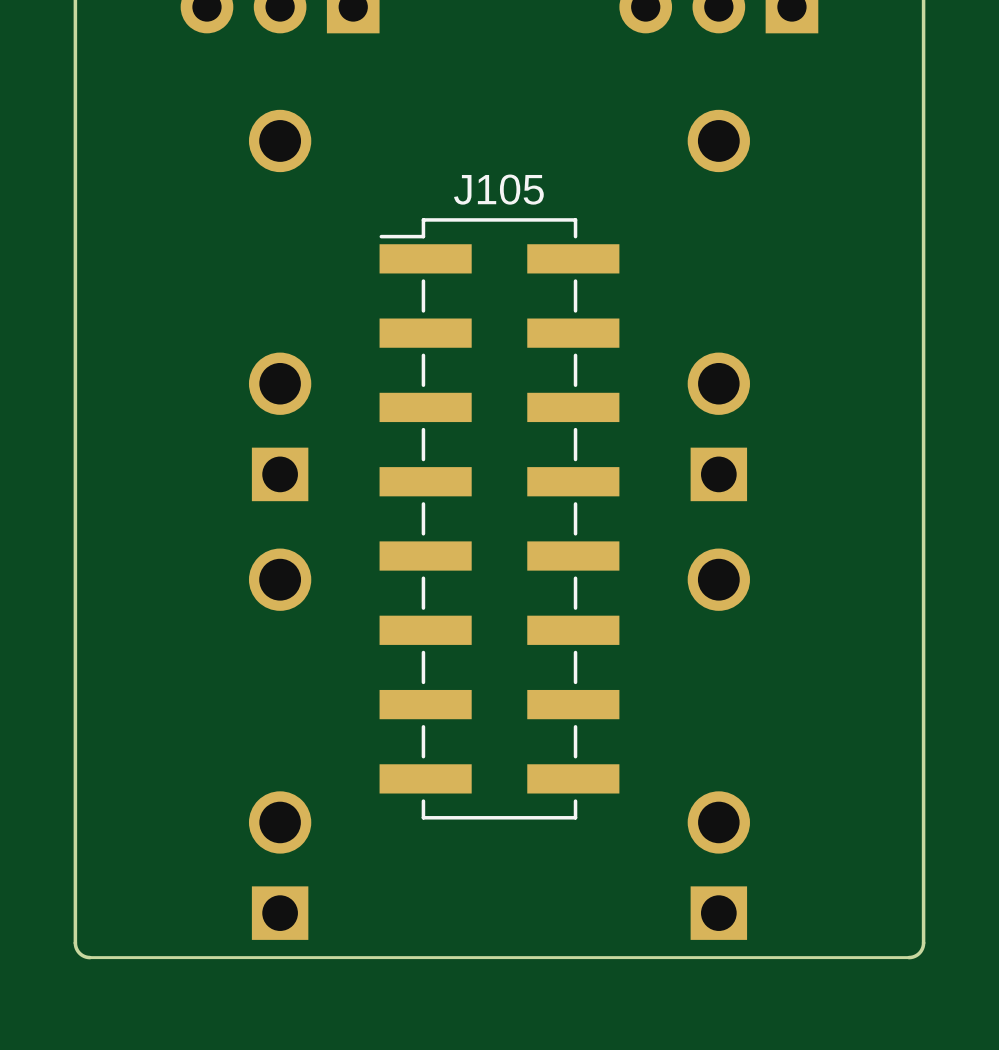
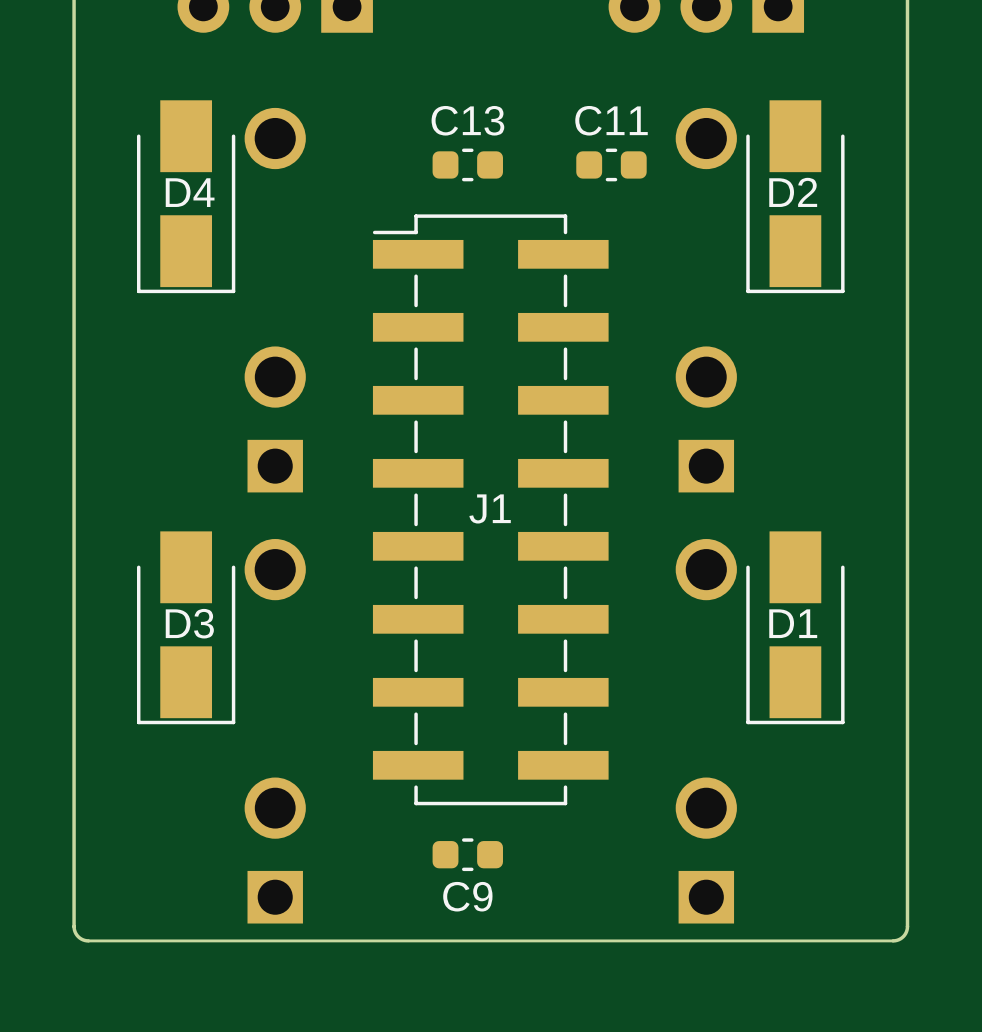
C13: none -> (467, 164)
C11: none -> (611, 164)
J105 name: J105 (498, 189) -> J1 (490, 508)
D4: none -> (186, 196)
D2: none -> (795, 196)
D3: none -> (186, 627)
D1: none -> (795, 627)
C9: none -> (467, 854)

